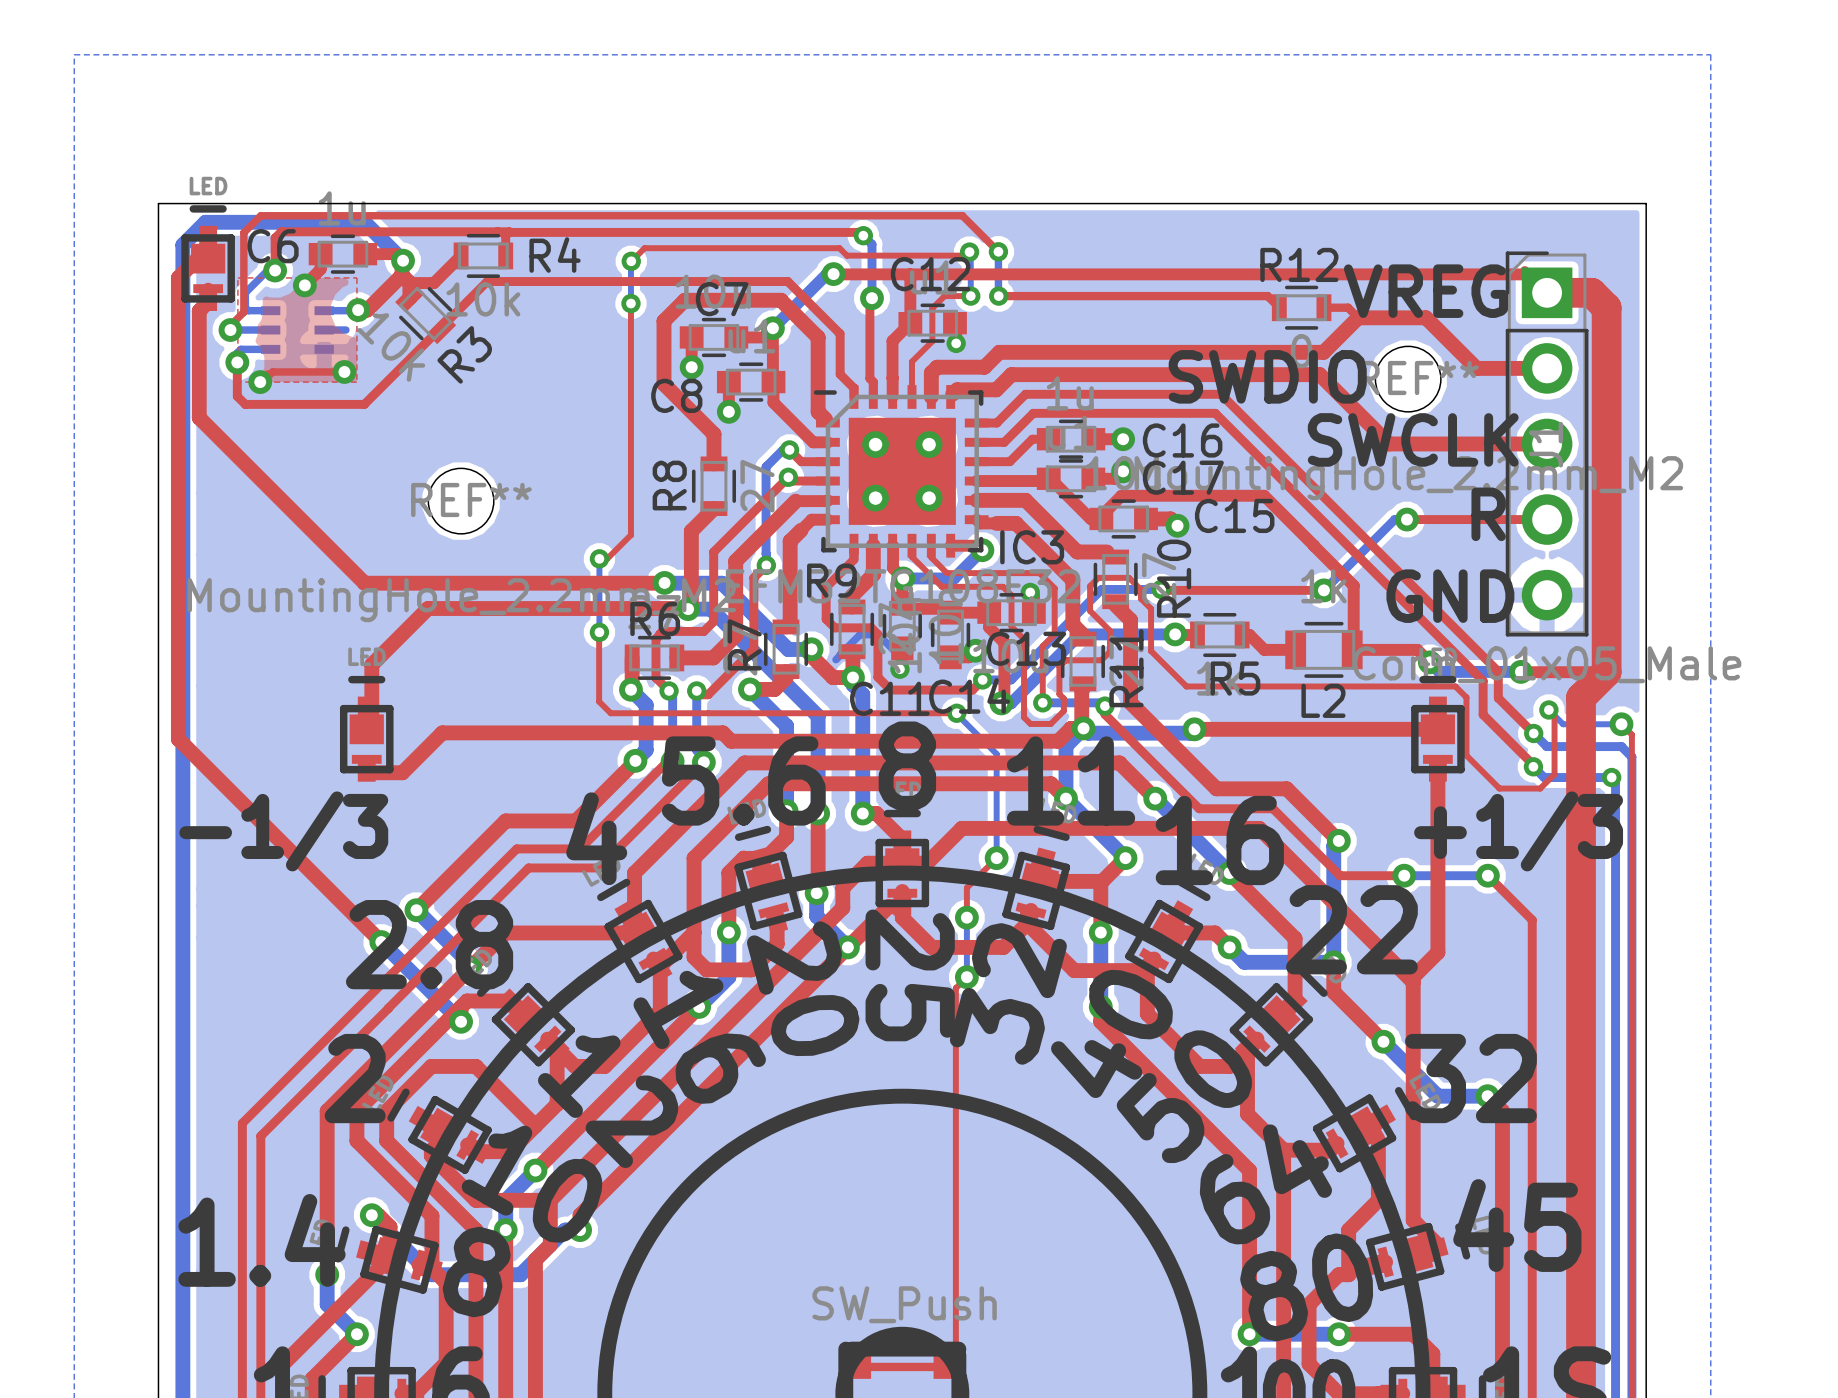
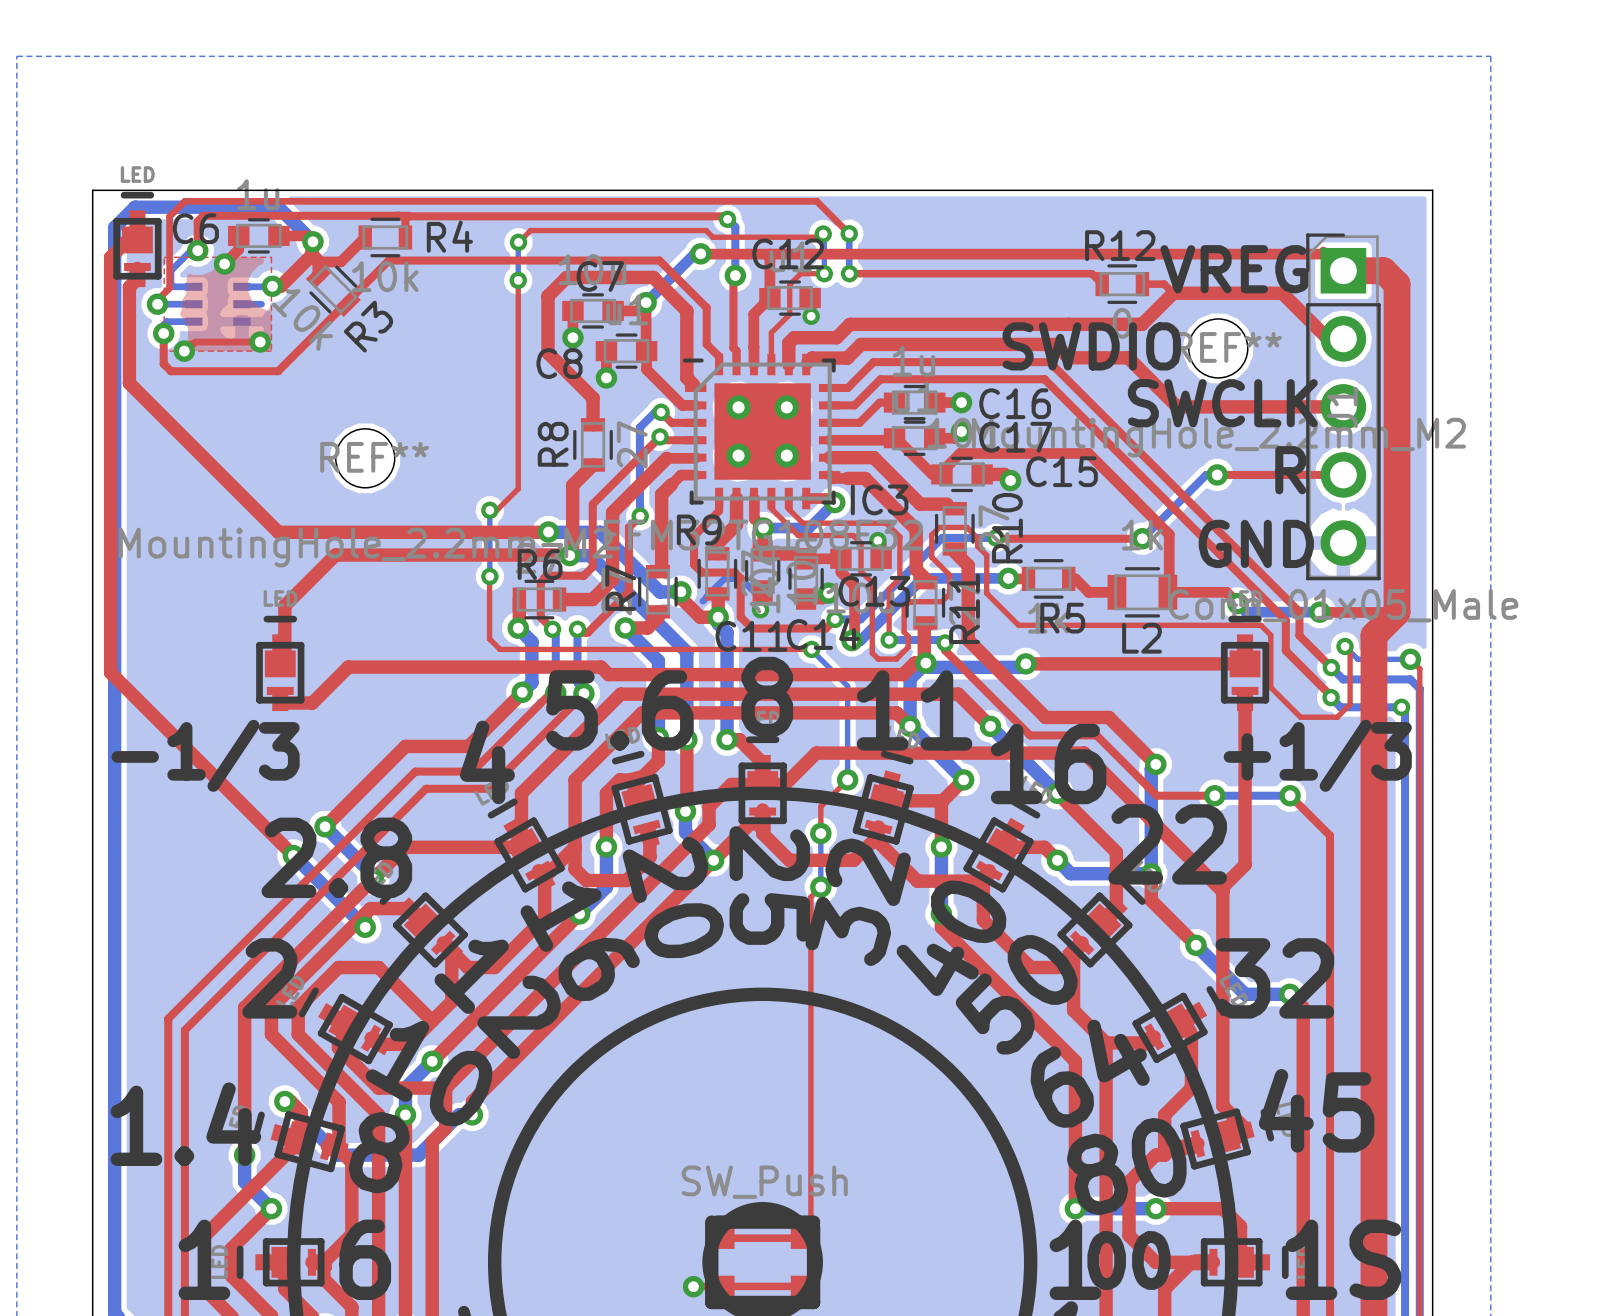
top track: (1426, 317) (1476, 368) (1529, 368) -> (1234, 293) (1282, 293) (1327, 338)
top track: (1227, 374) (1319, 374) (1389, 443) -> (1055, 344) (1068, 357) (1128, 357) (1177, 406) (1201, 406)

